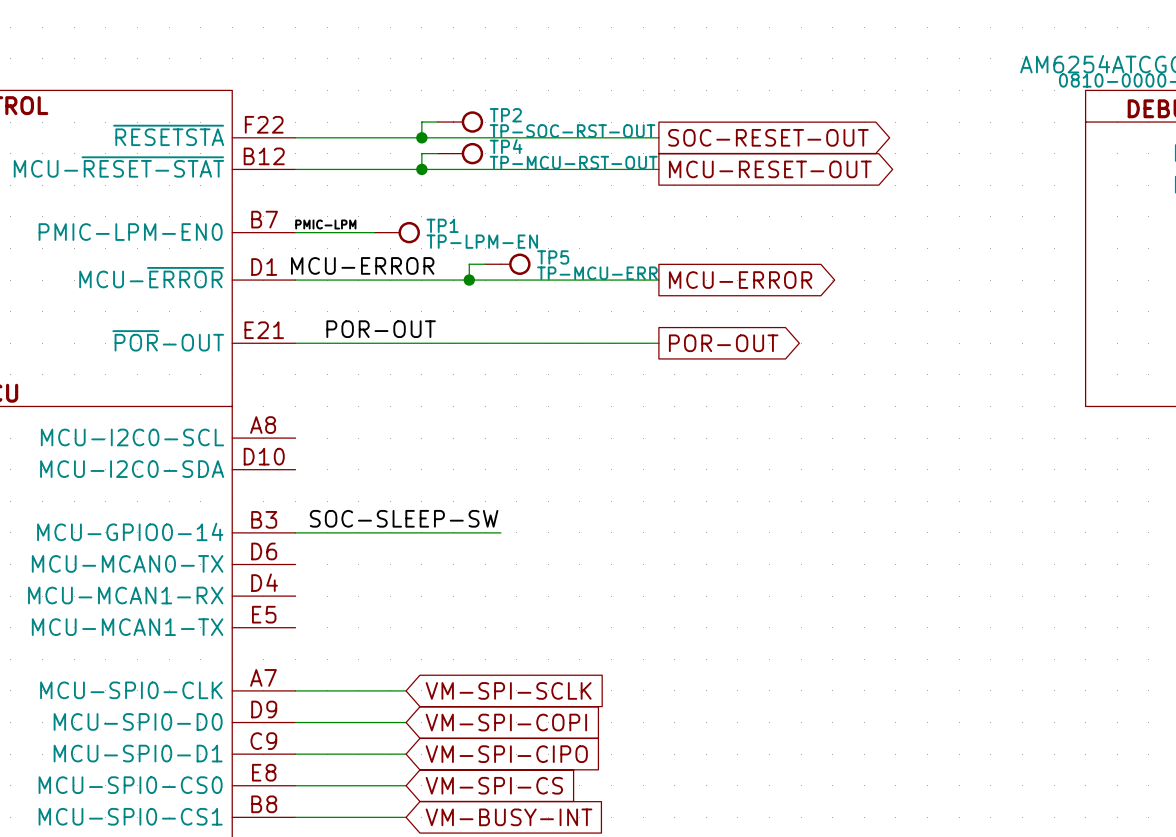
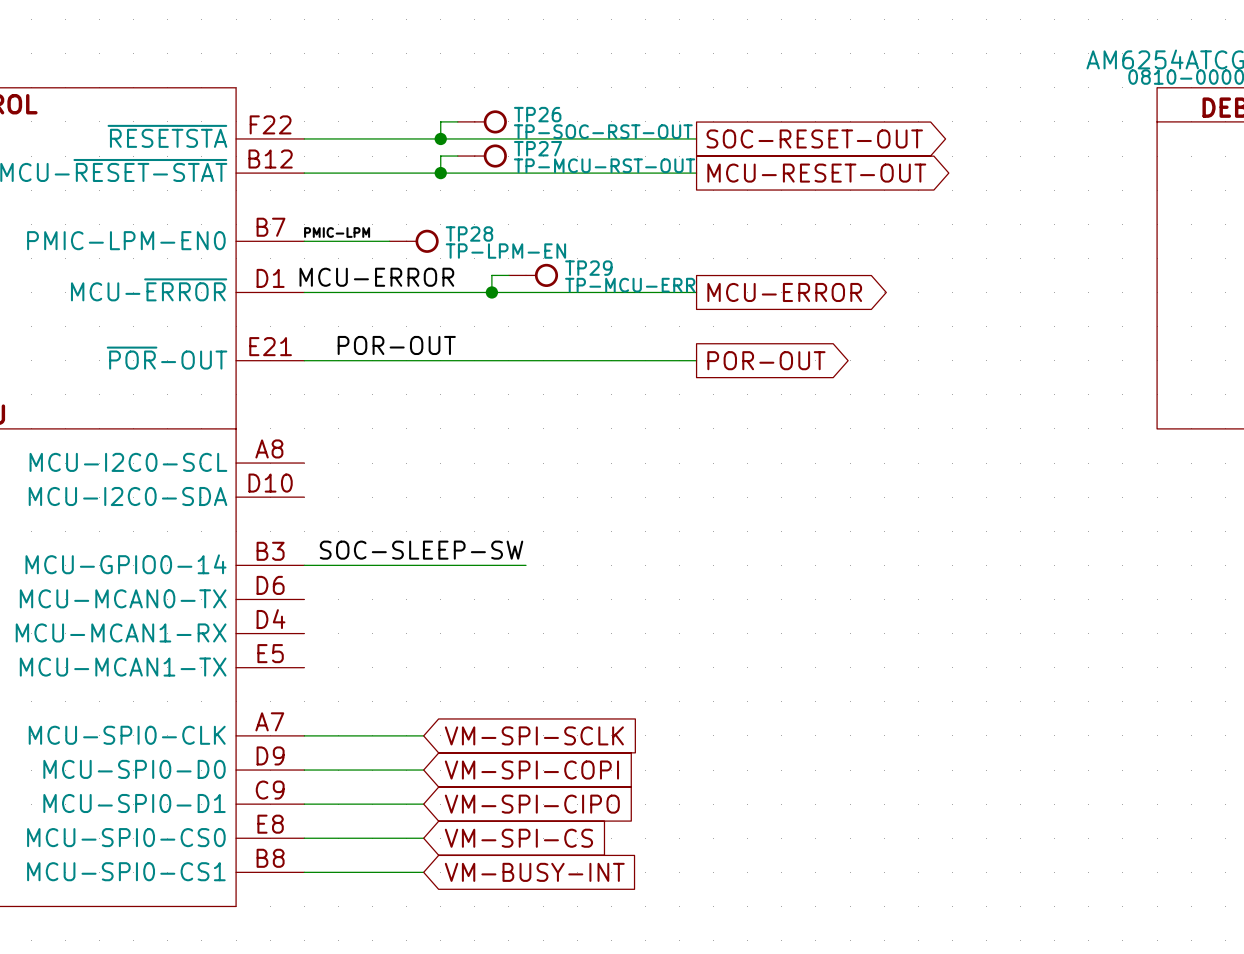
TP2 name: TP2 (505, 115) -> TP26 (537, 114)
TP4 name: TP4 (506, 146) -> TP27 (538, 148)
TP1 name: TP1 (442, 225) -> TP28 (469, 233)
TP5 name: TP5 (553, 257) -> TP29 (588, 268)

